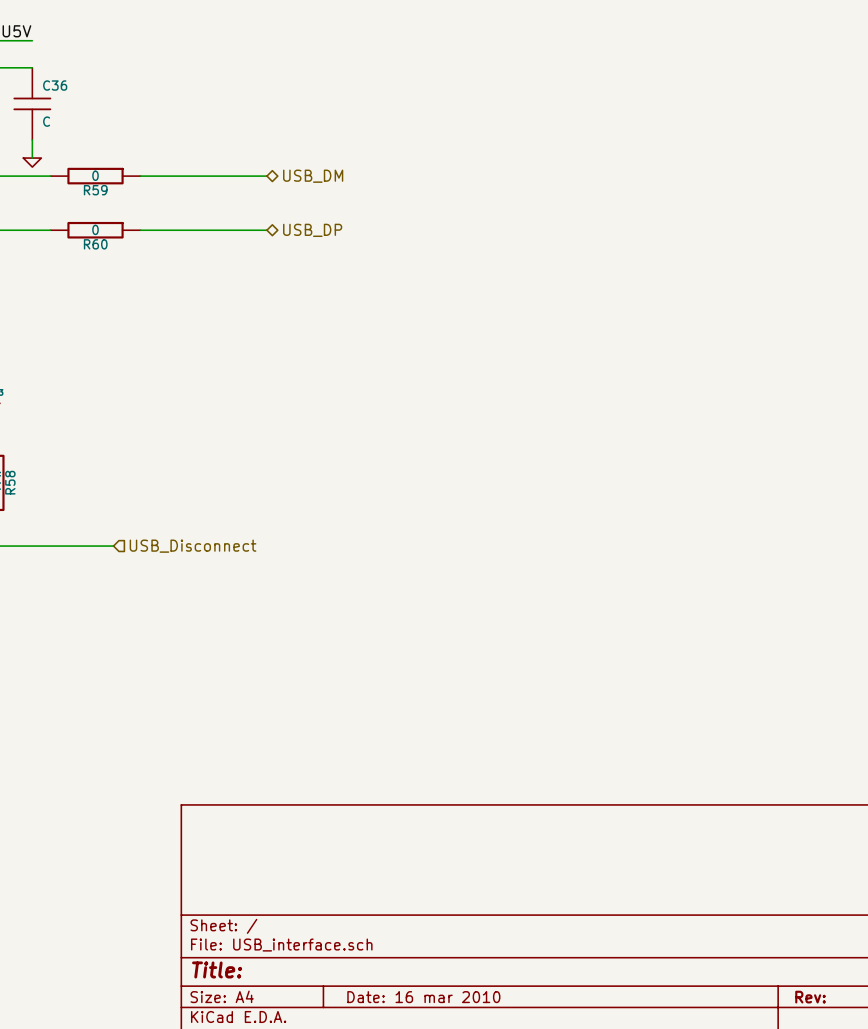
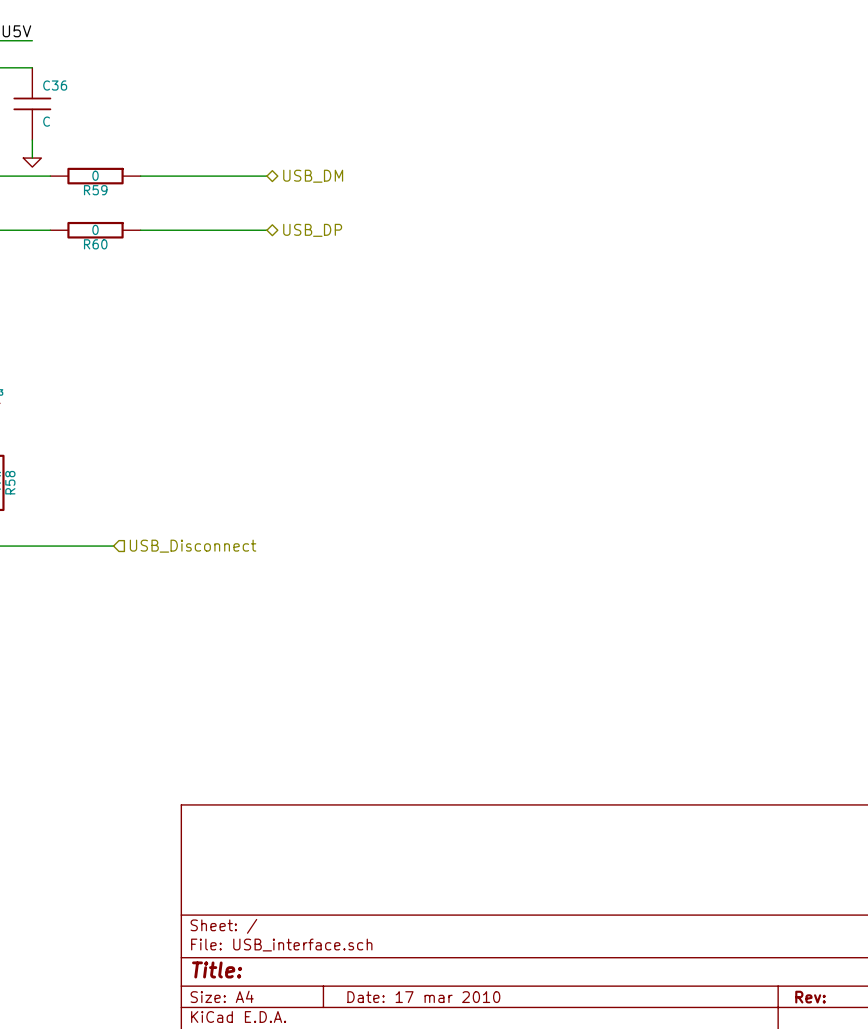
title block: Date: 16 mar 2010 (423, 997) -> Date: 17 mar 2010 (423, 997)

